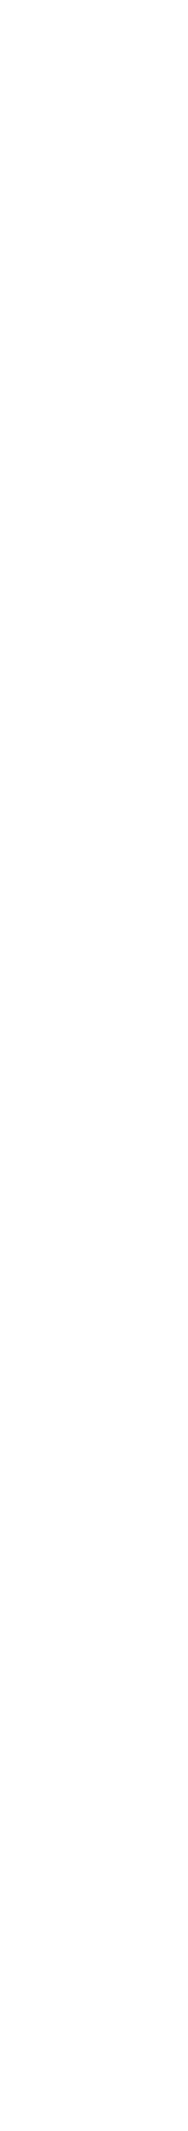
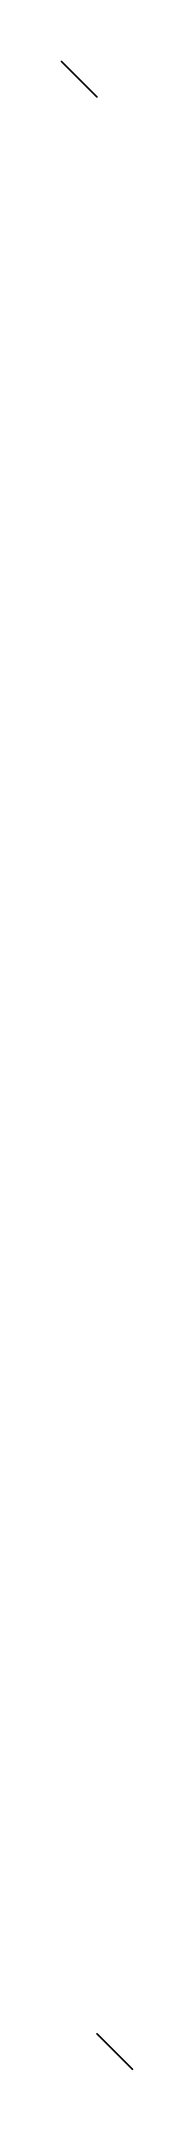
wire: none -> (61, 61) (96, 96)
wire: none -> (96, 2033) (132, 2069)

